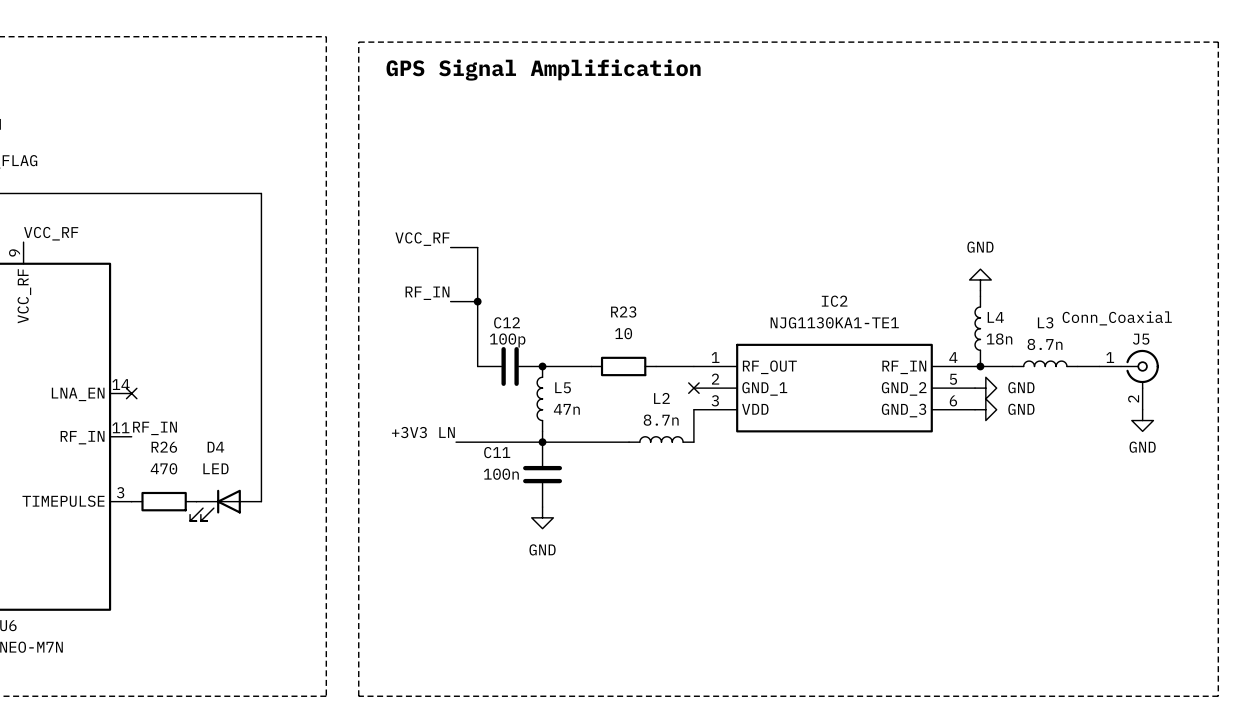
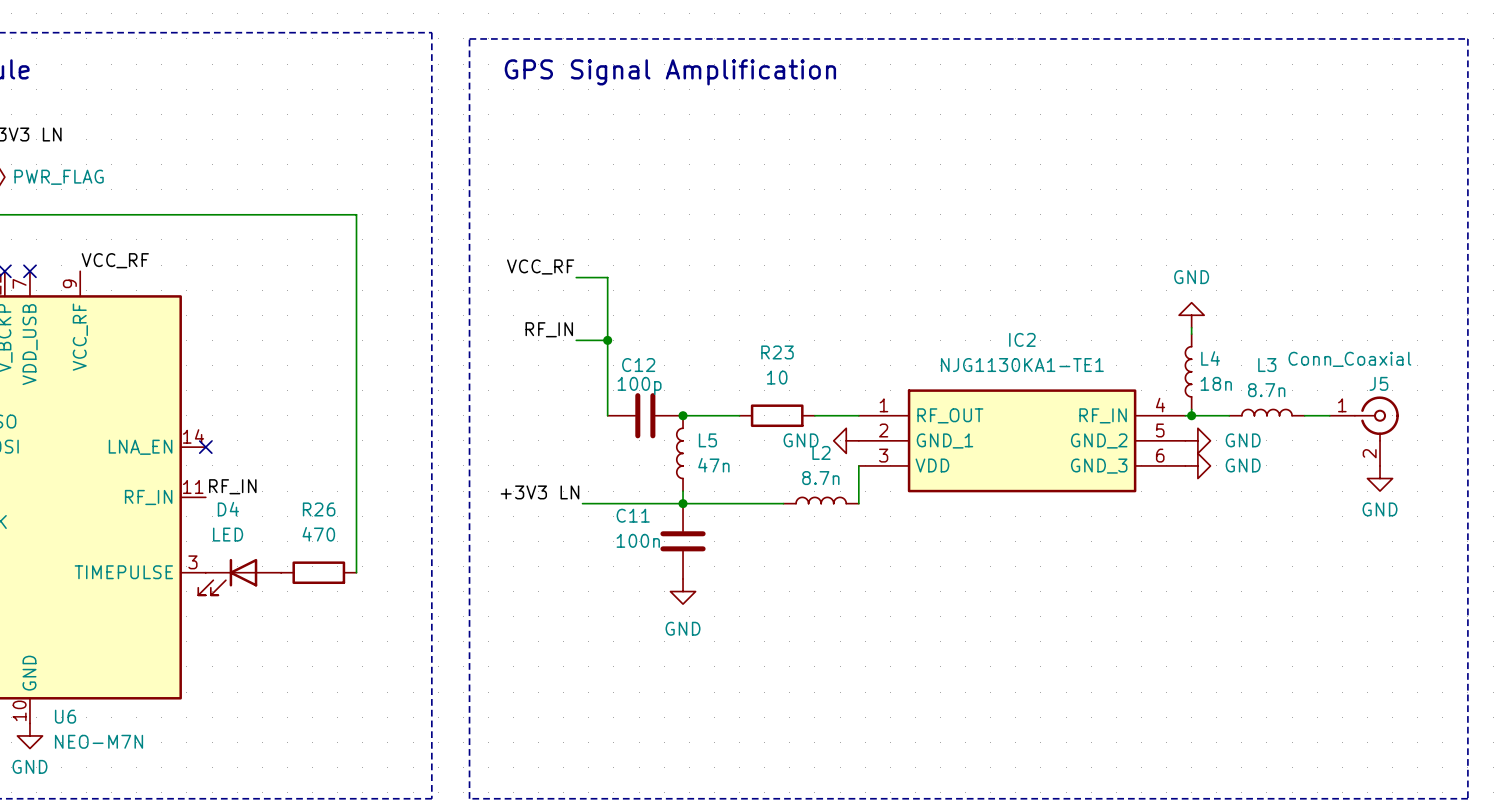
power symbol: none -> GND (846, 440)
no-connect mark: (693, 388) -> none
R26 position: (164, 501) -> (318, 572)
D4 position: (225, 505) -> (239, 577)

